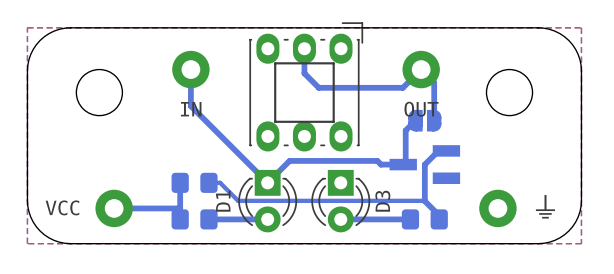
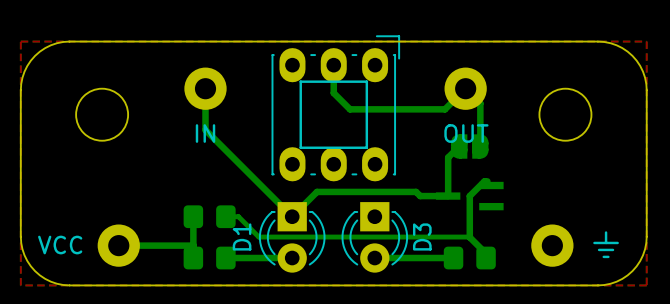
part footprint: [389, 145, 461, 185] -> [435, 181, 504, 211]

